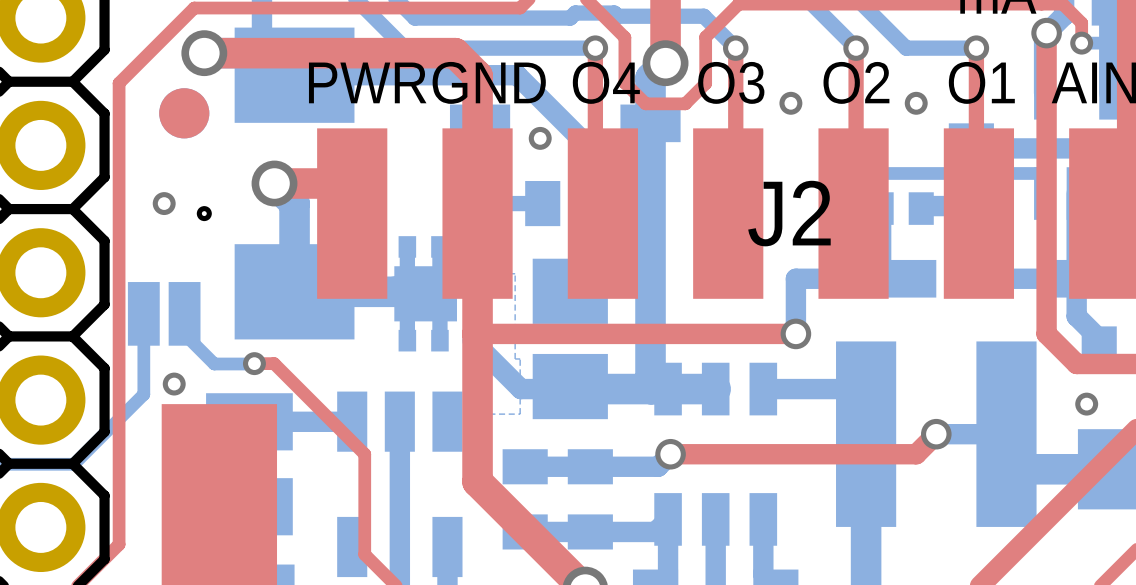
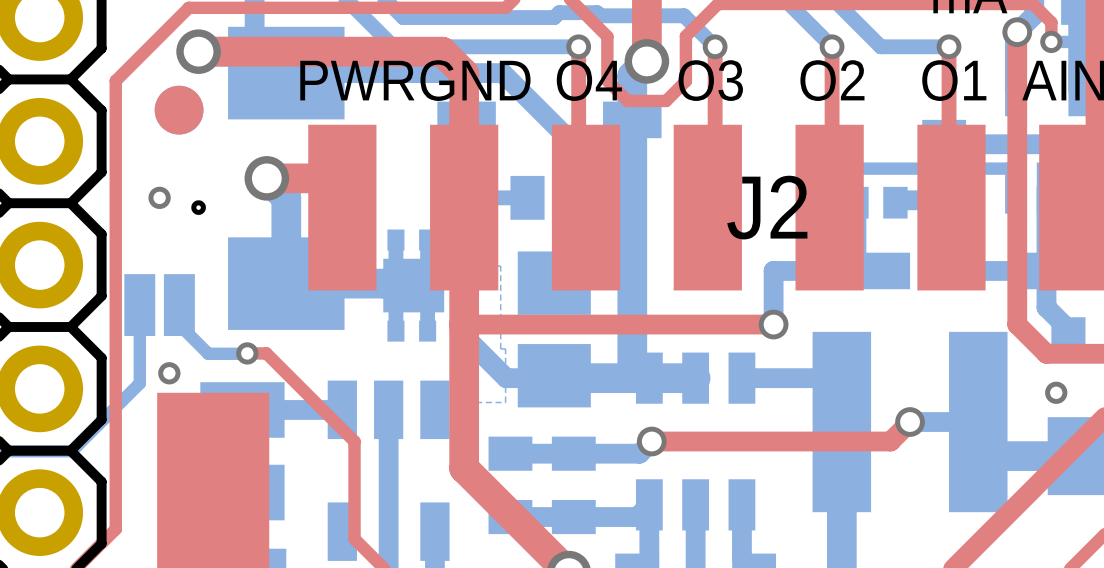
via: (790, 103) -> none
via: (916, 103) -> none
via: (540, 138) -> none

